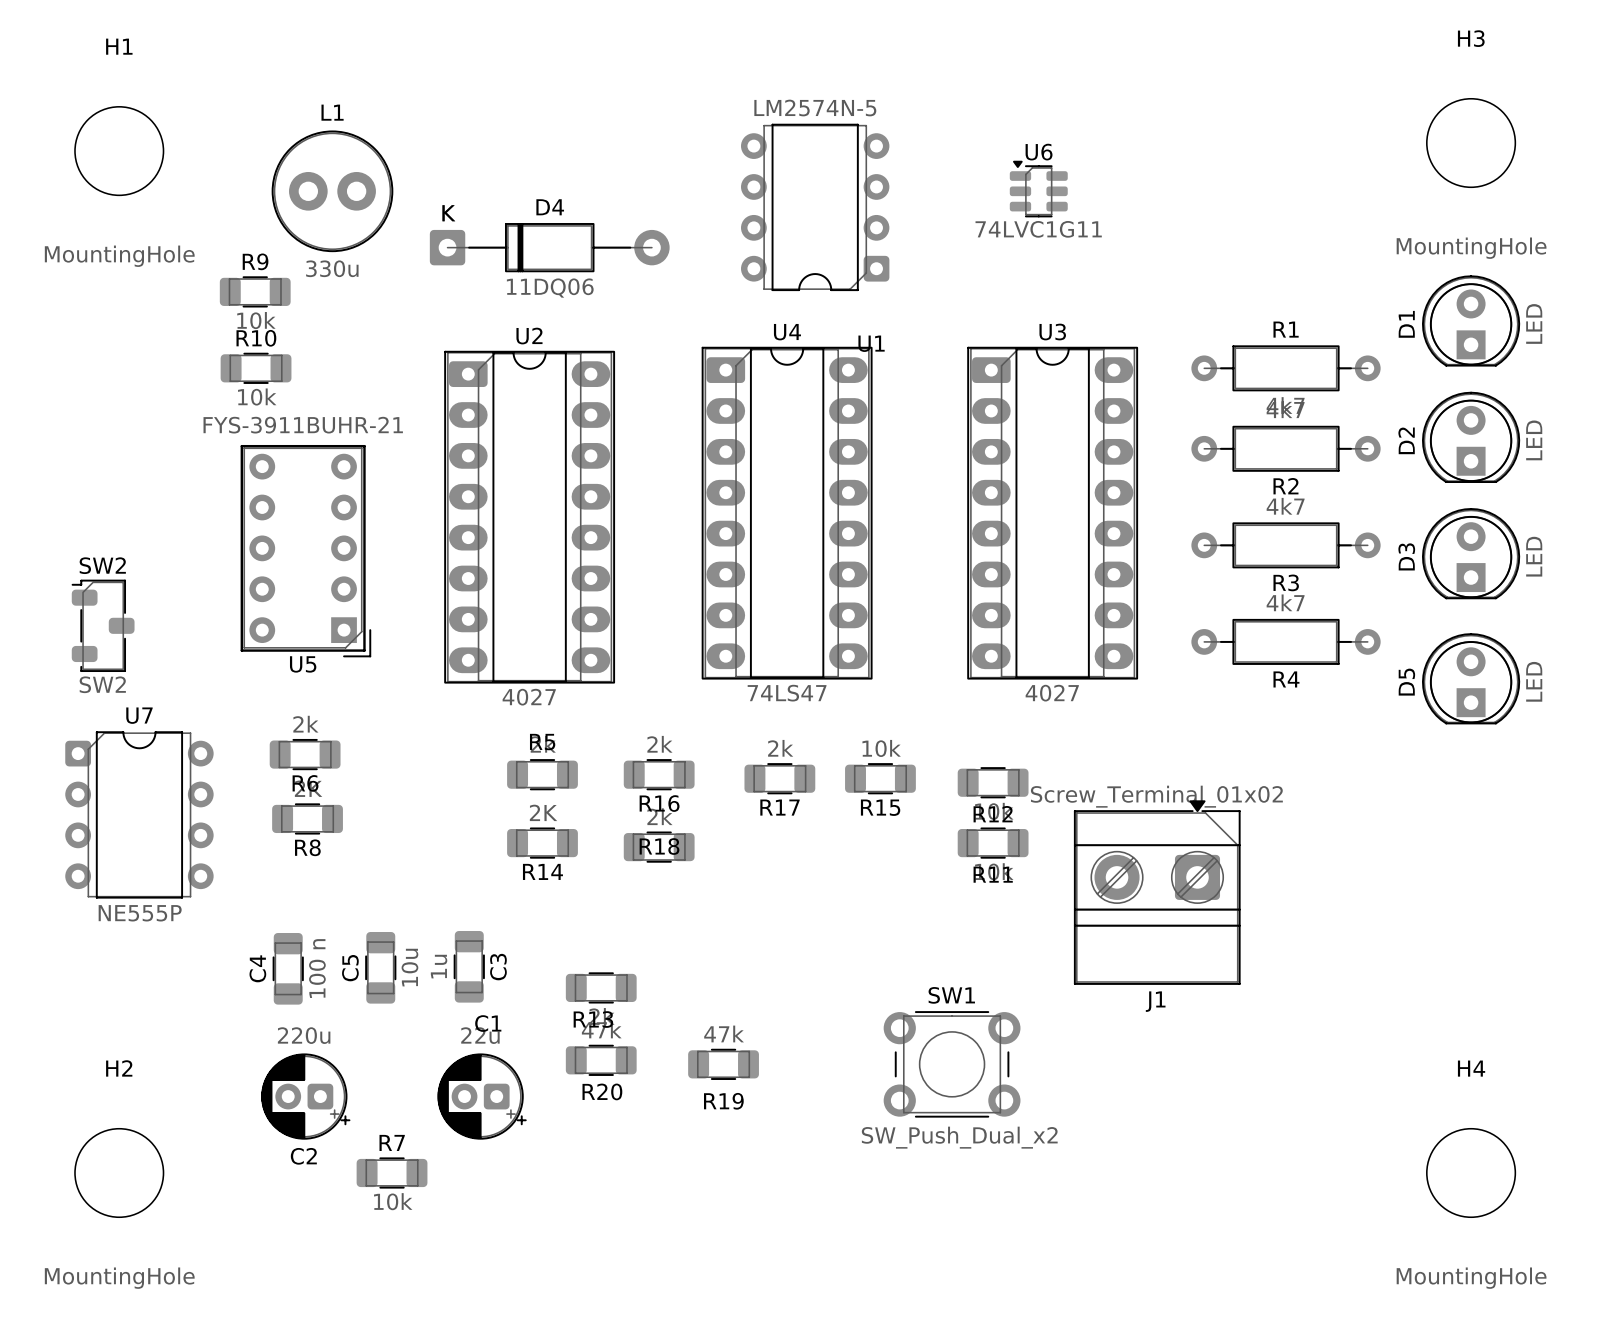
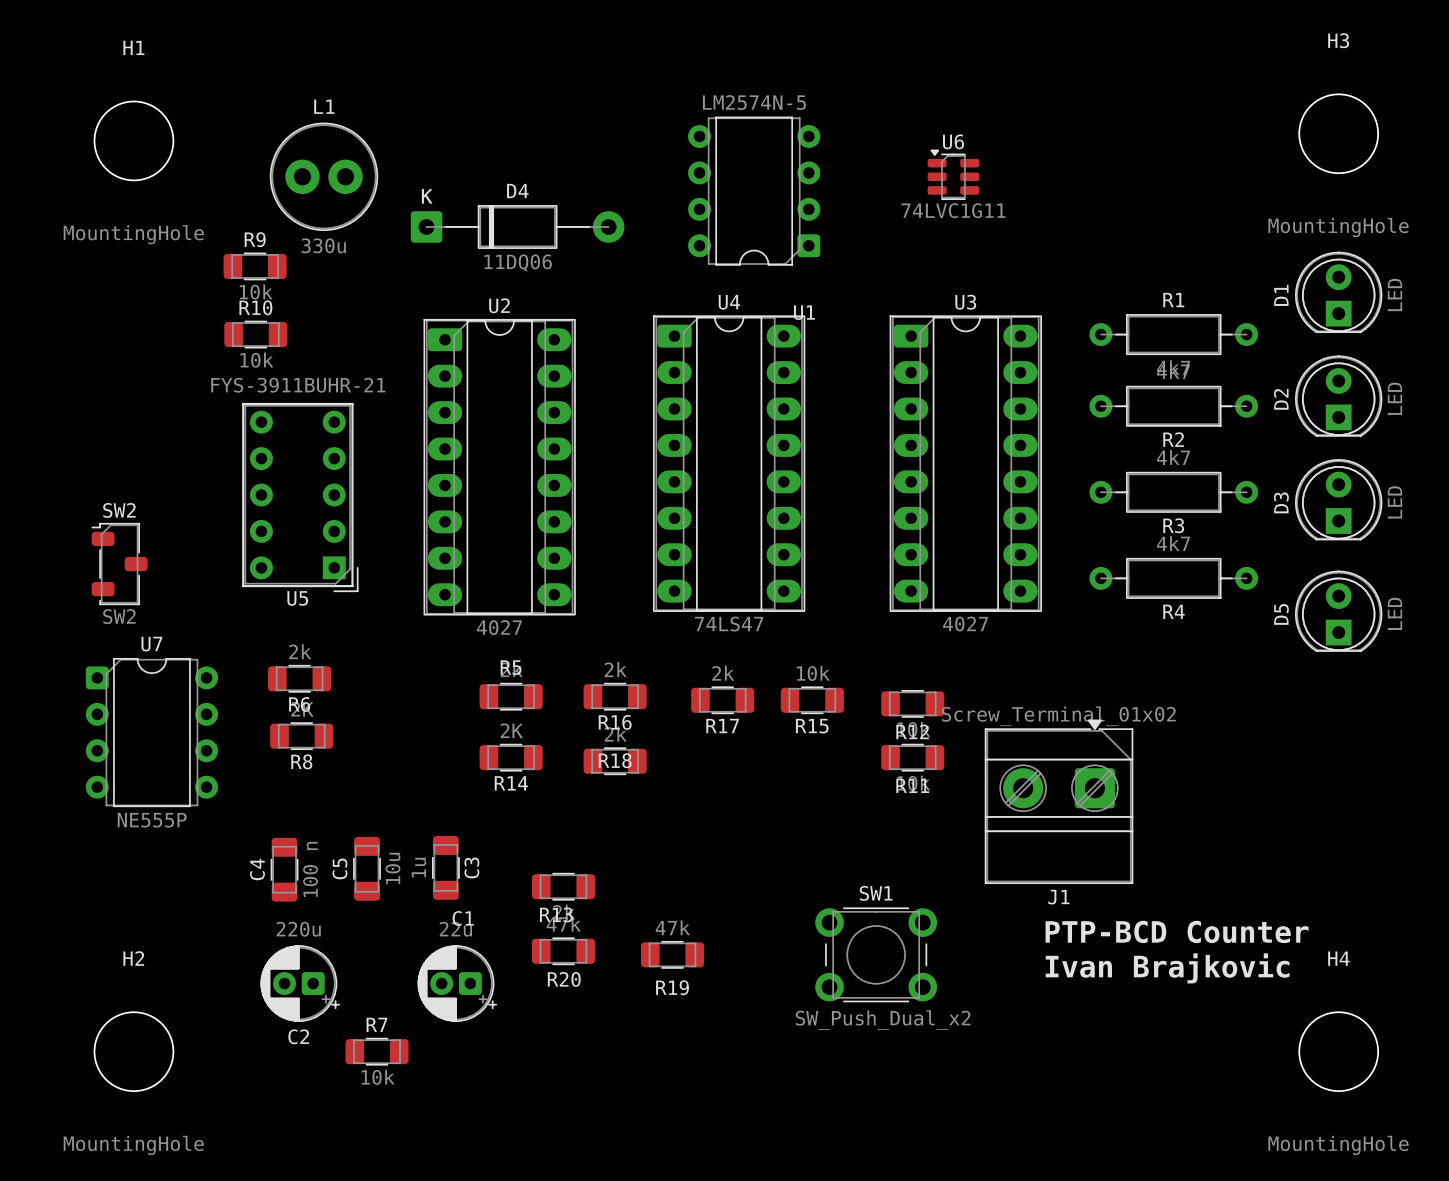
text: none -> PTP-BCD Counter (1177, 931)
text: none -> Ivan Brajkovic (1167, 968)

